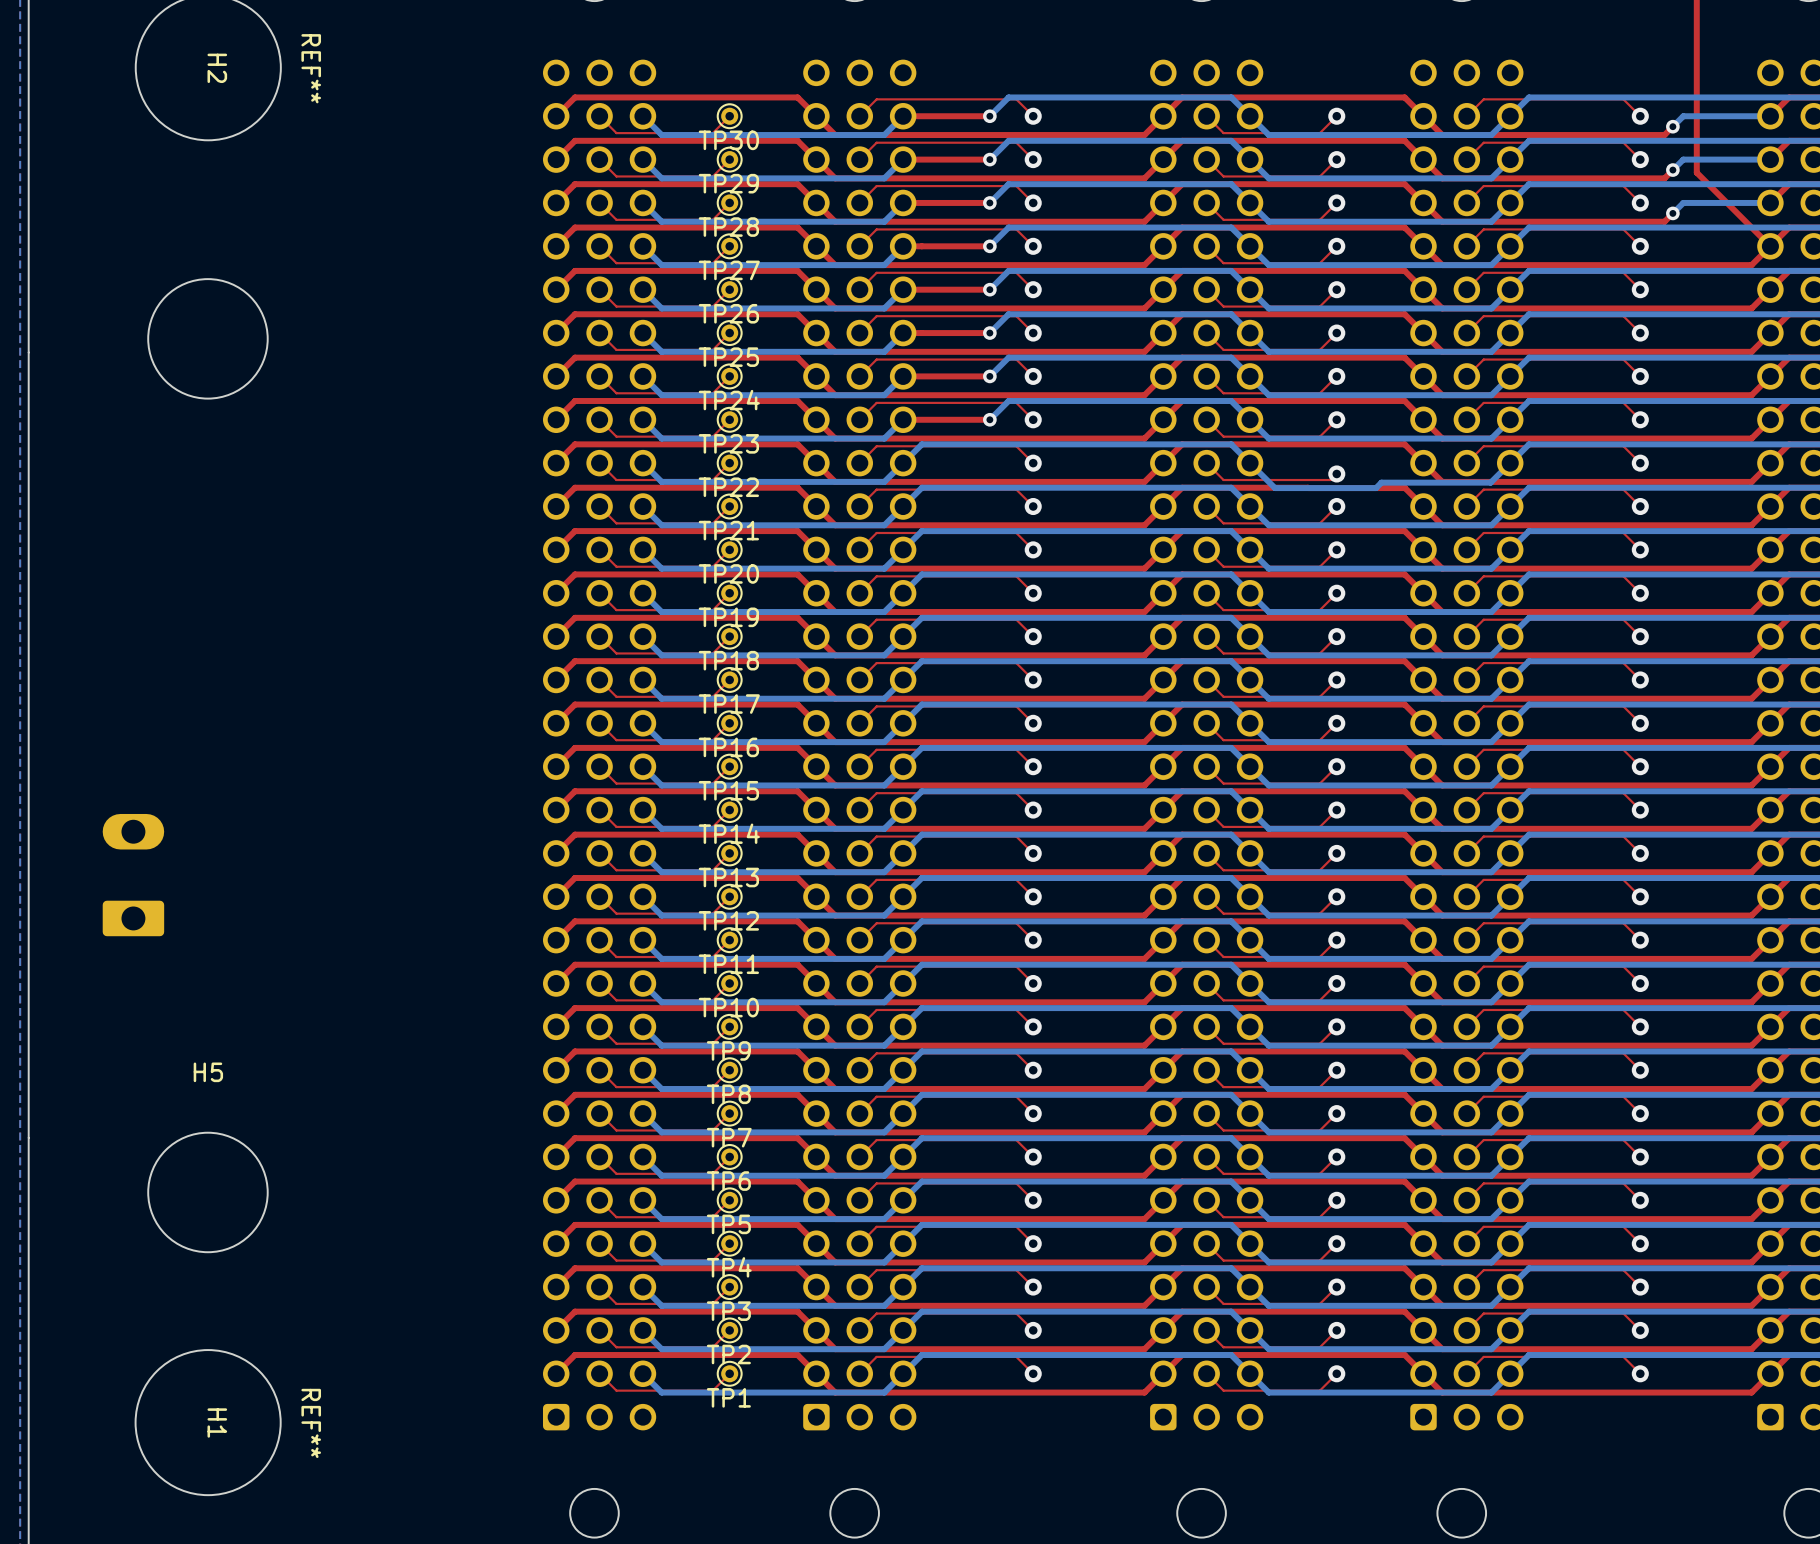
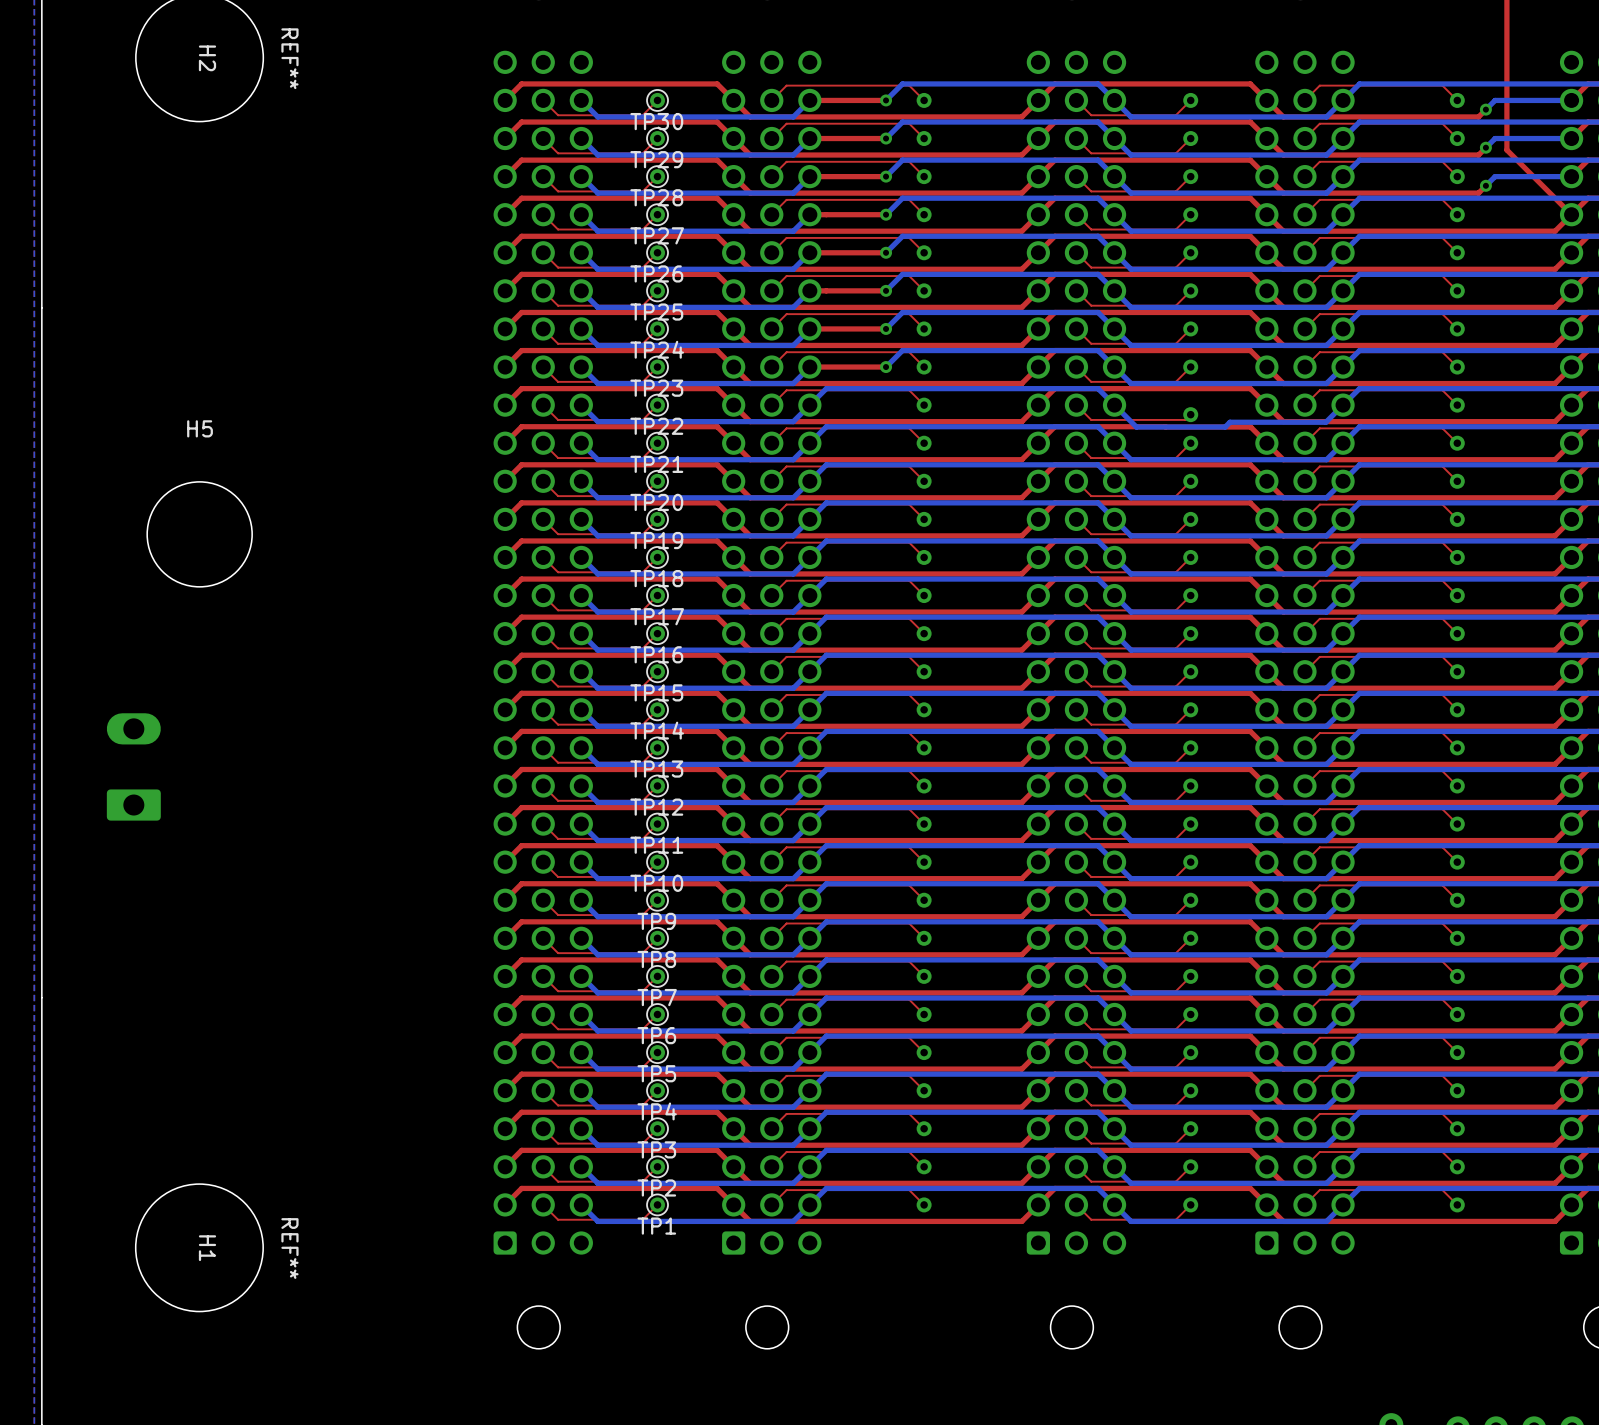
round board edge position: (207, 338) -> (199, 534)
H5 position: (208, 1072) -> (200, 428)
round board edge: [147, 1132, 269, 1253] -> none

